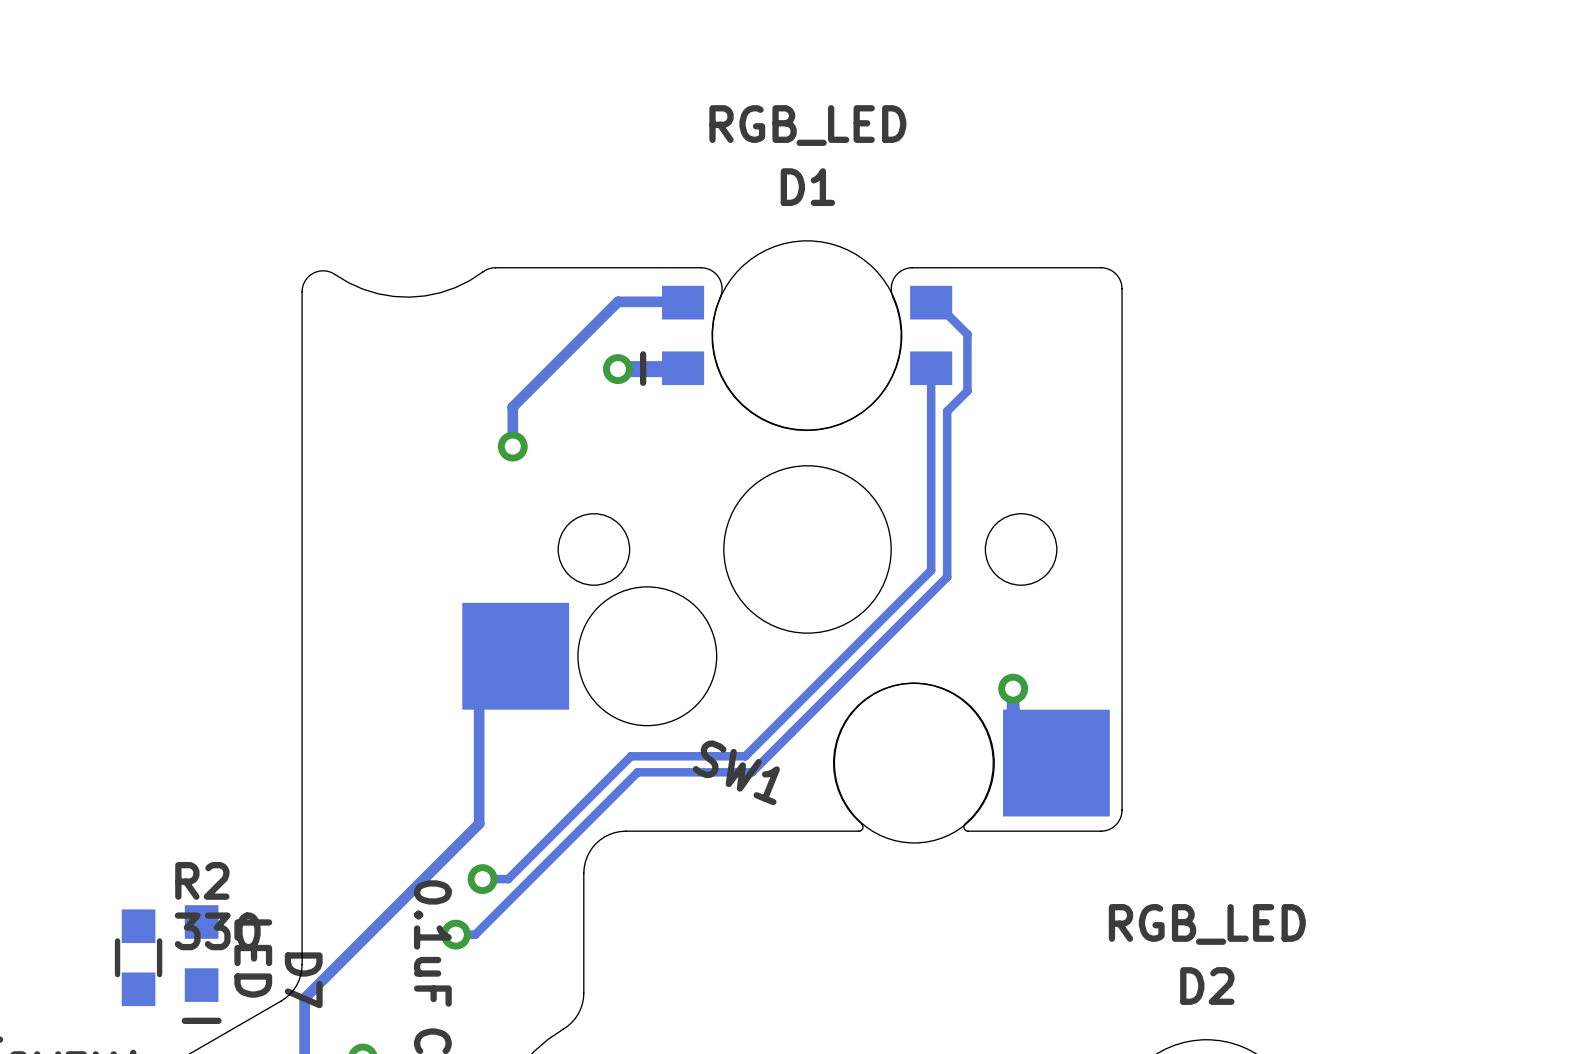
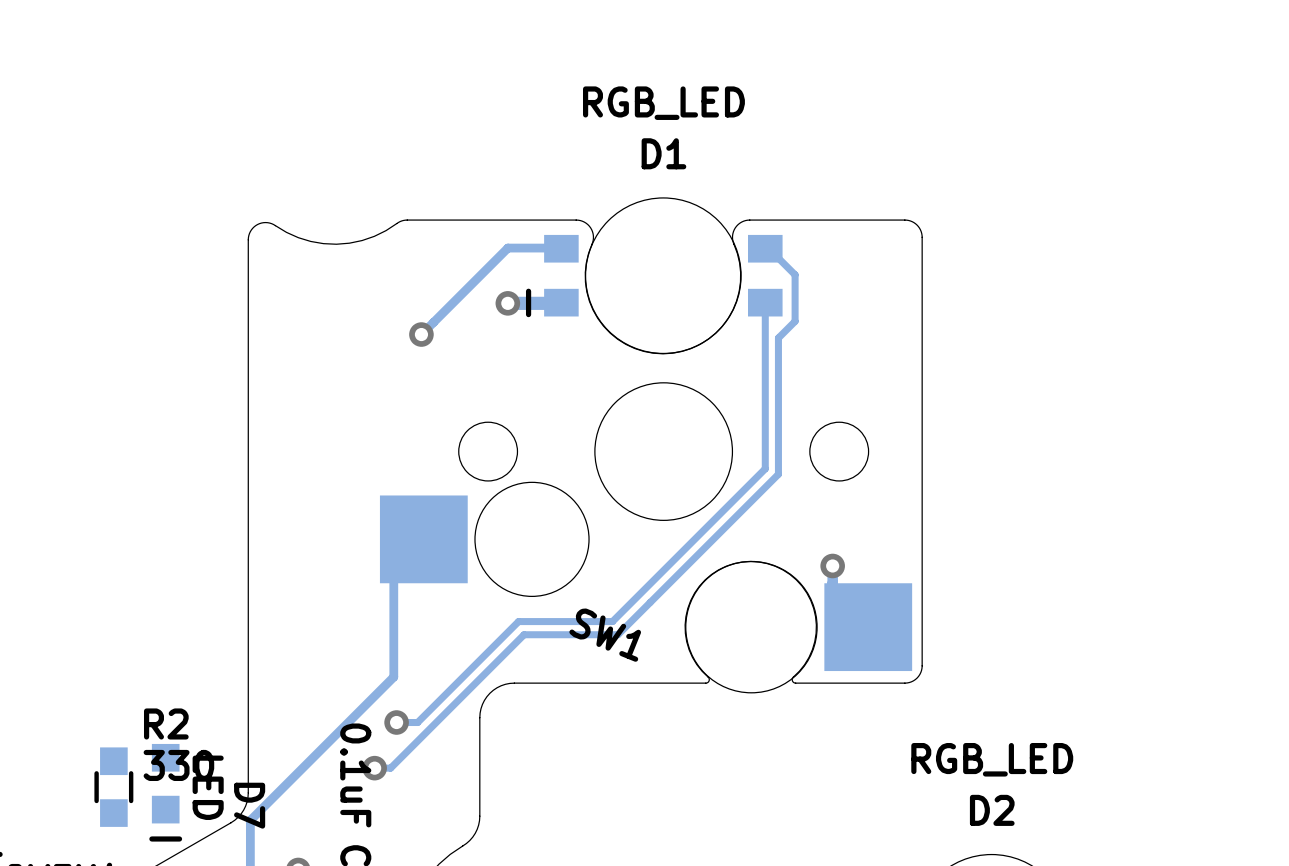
track: (512, 407) (512, 446) -> none
via position: (512, 446) -> (421, 334)

